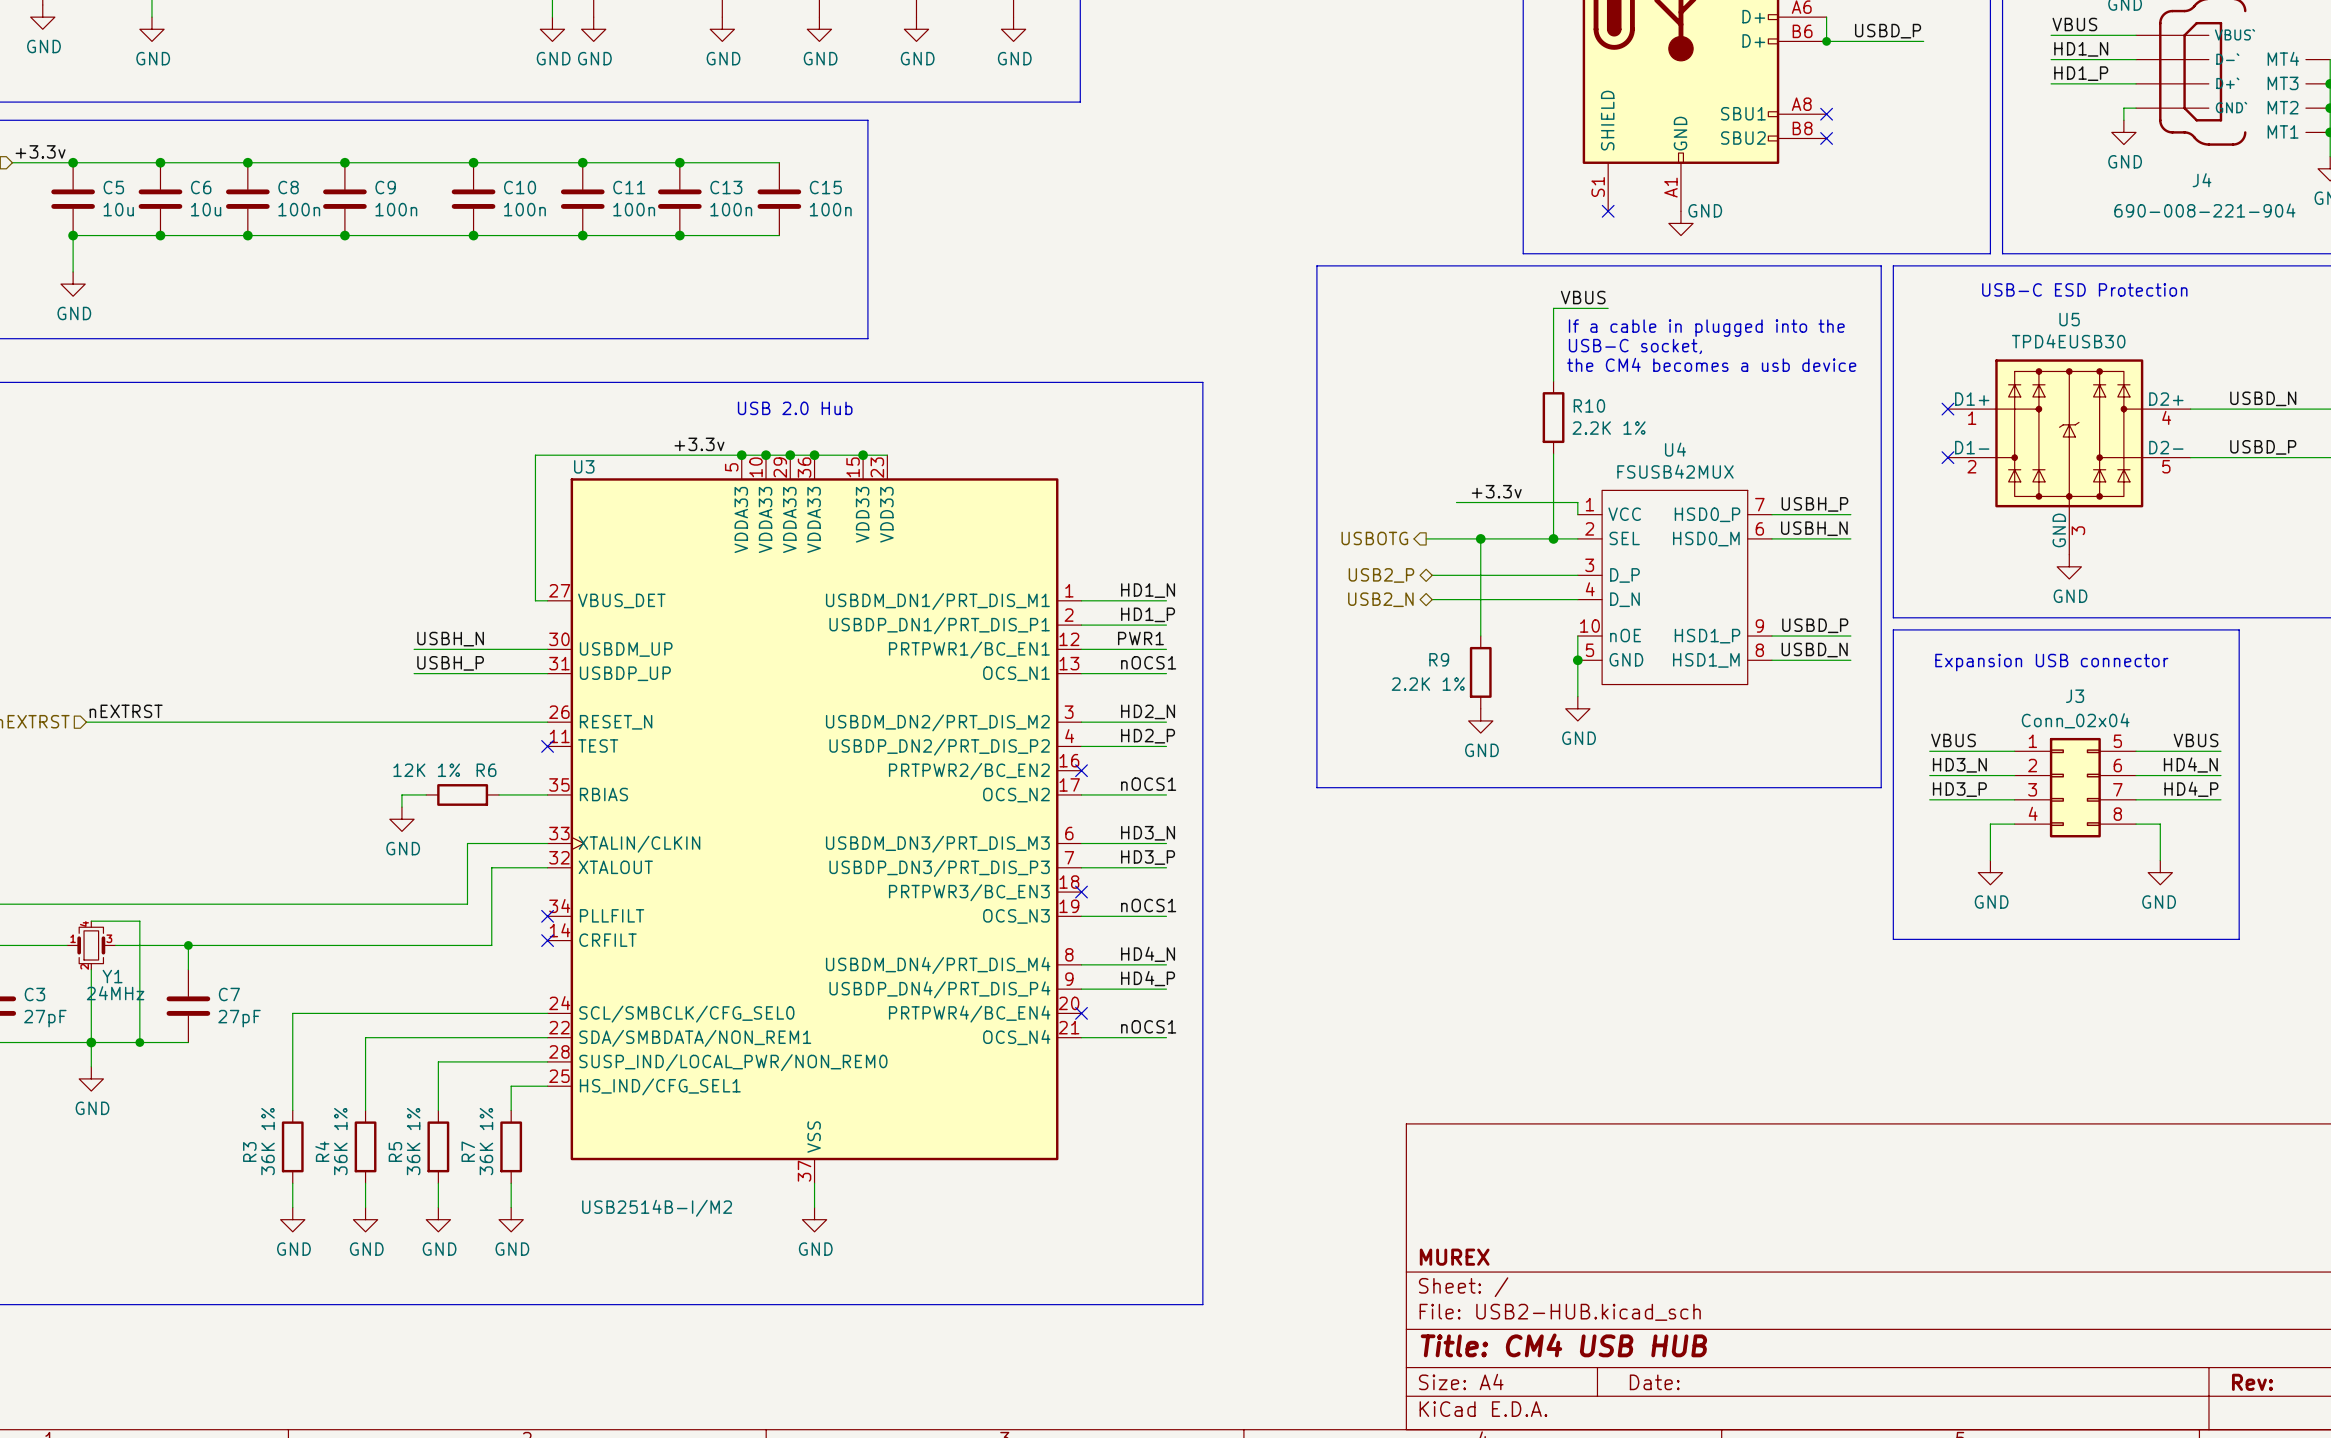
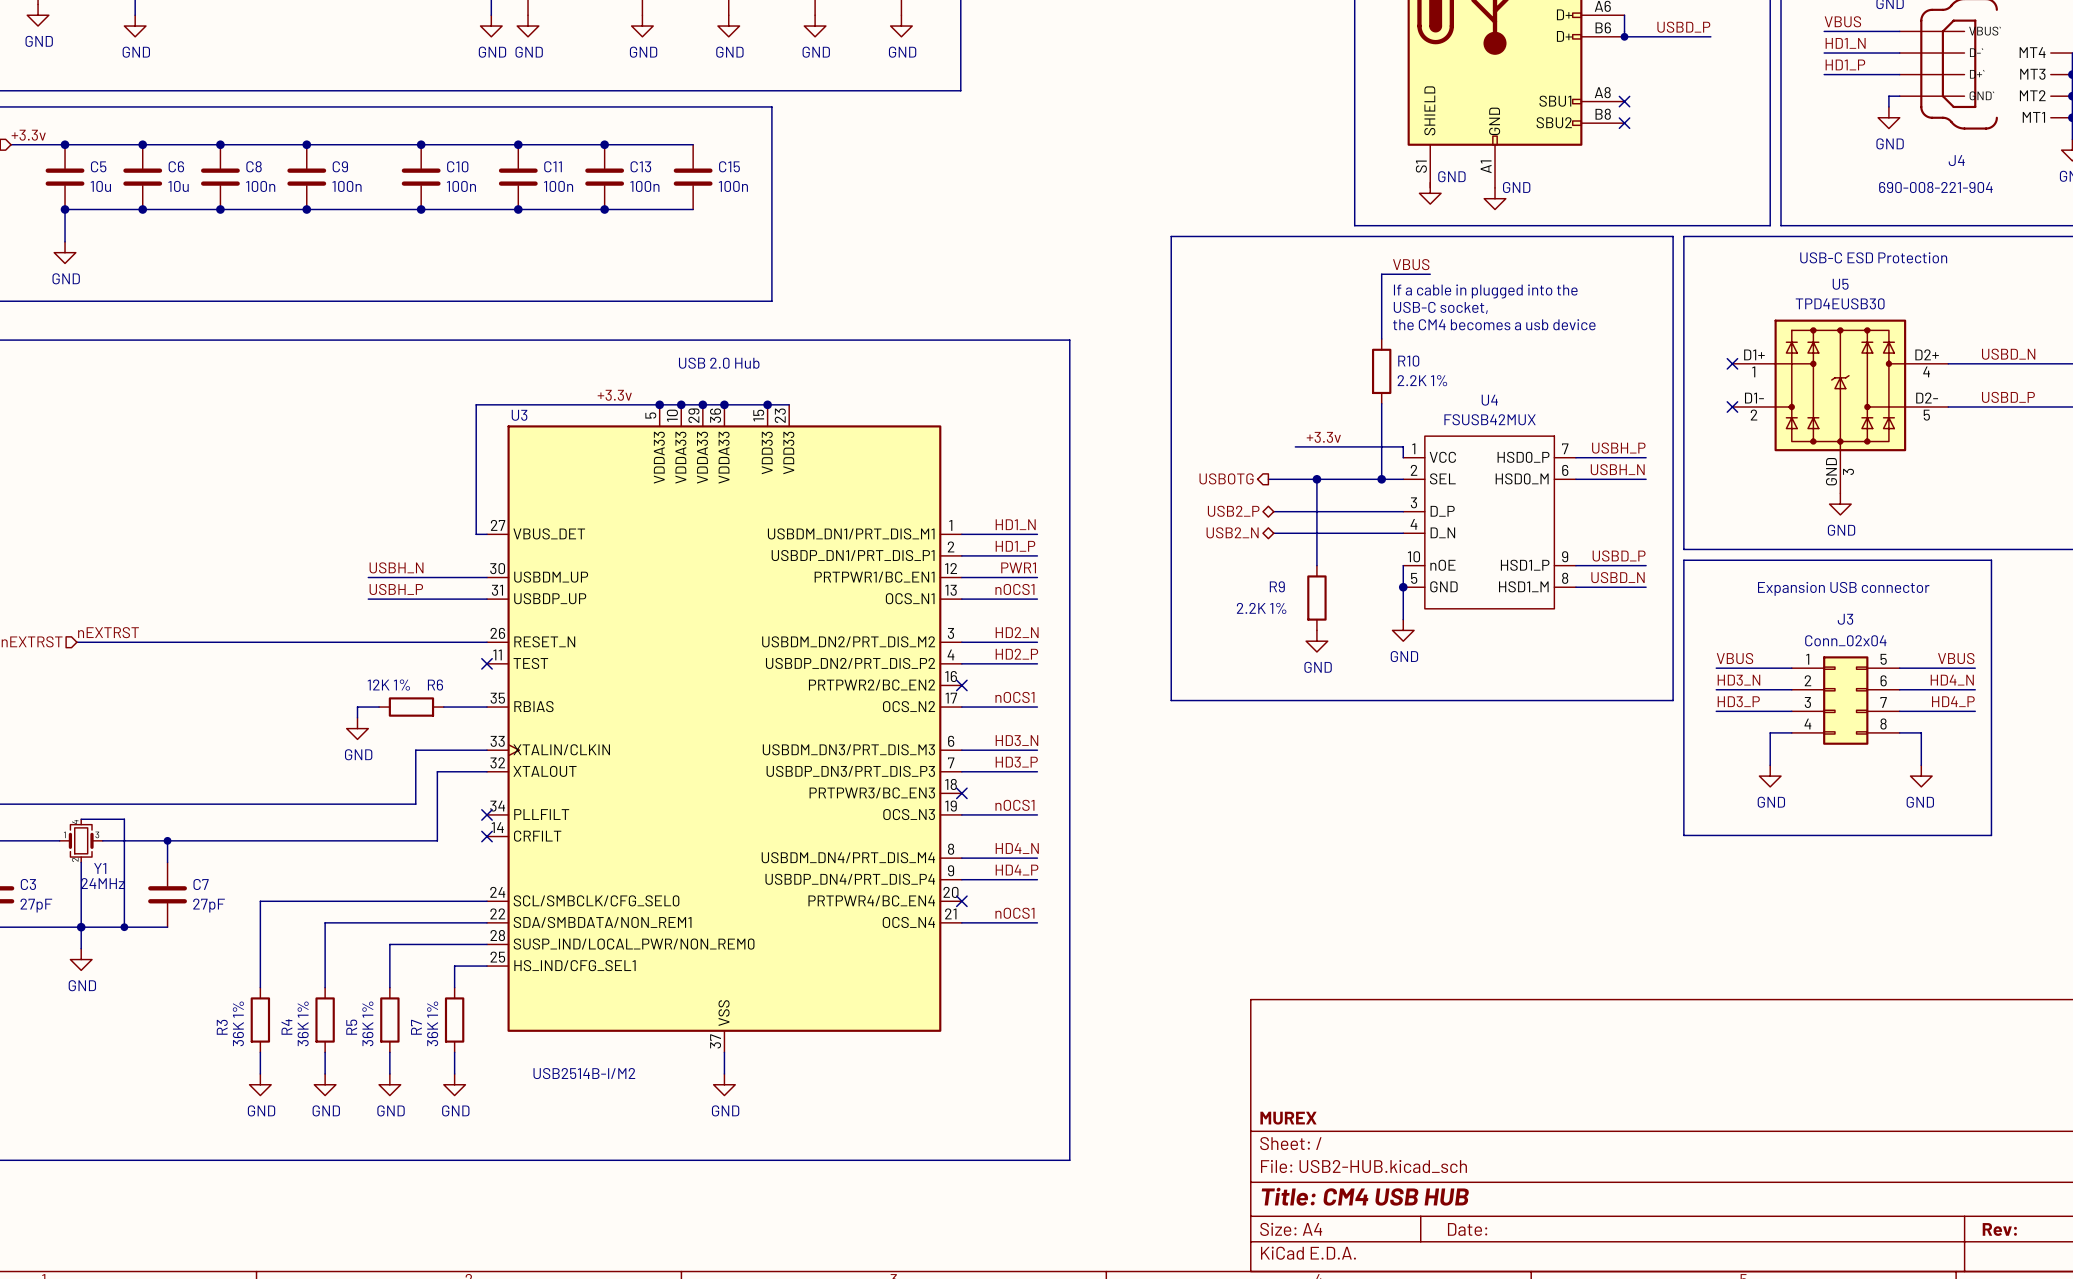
no-connect mark: (1608, 211) -> none
power symbol: none -> GND (1430, 193)

